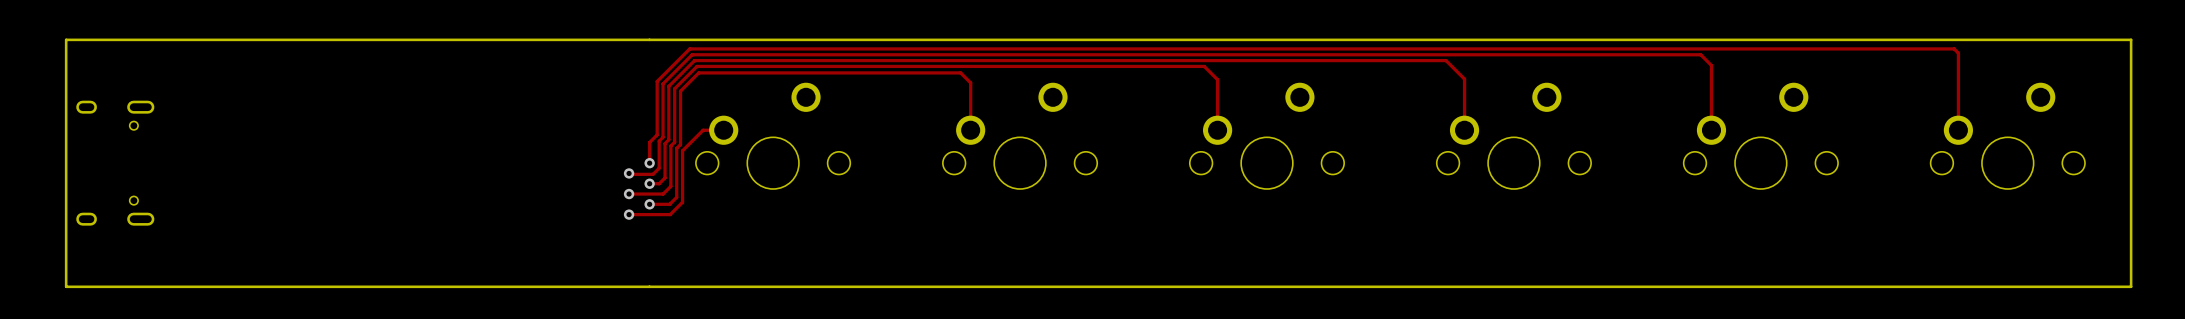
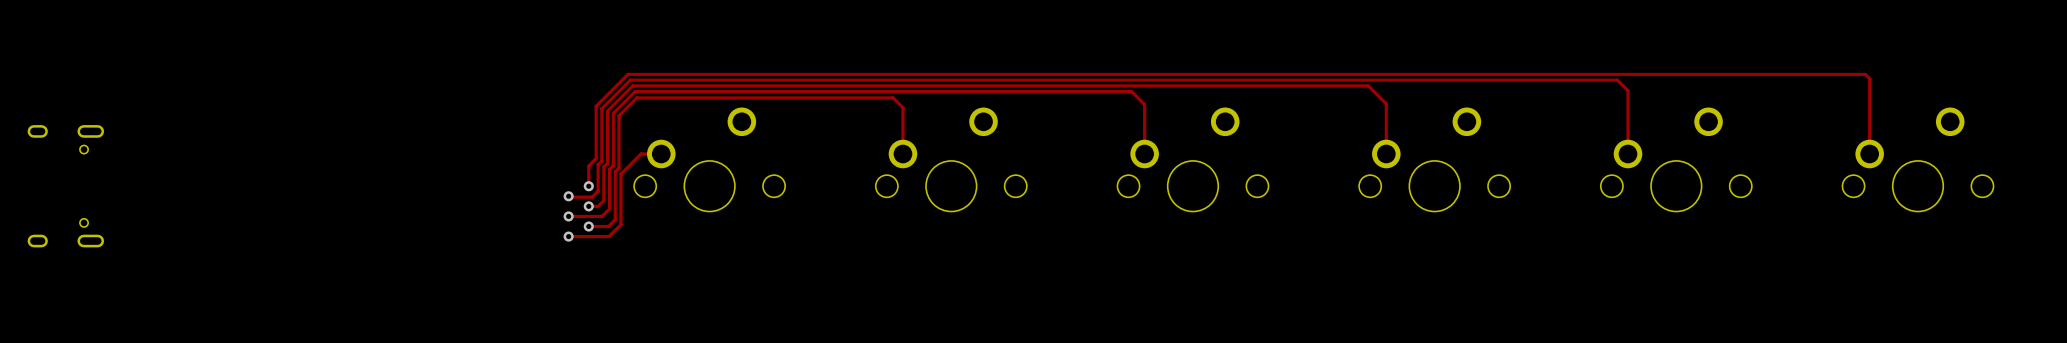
board edge: (66, 39) (2131, 39) (2131, 286) (66, 286) (66, 39) -> none

